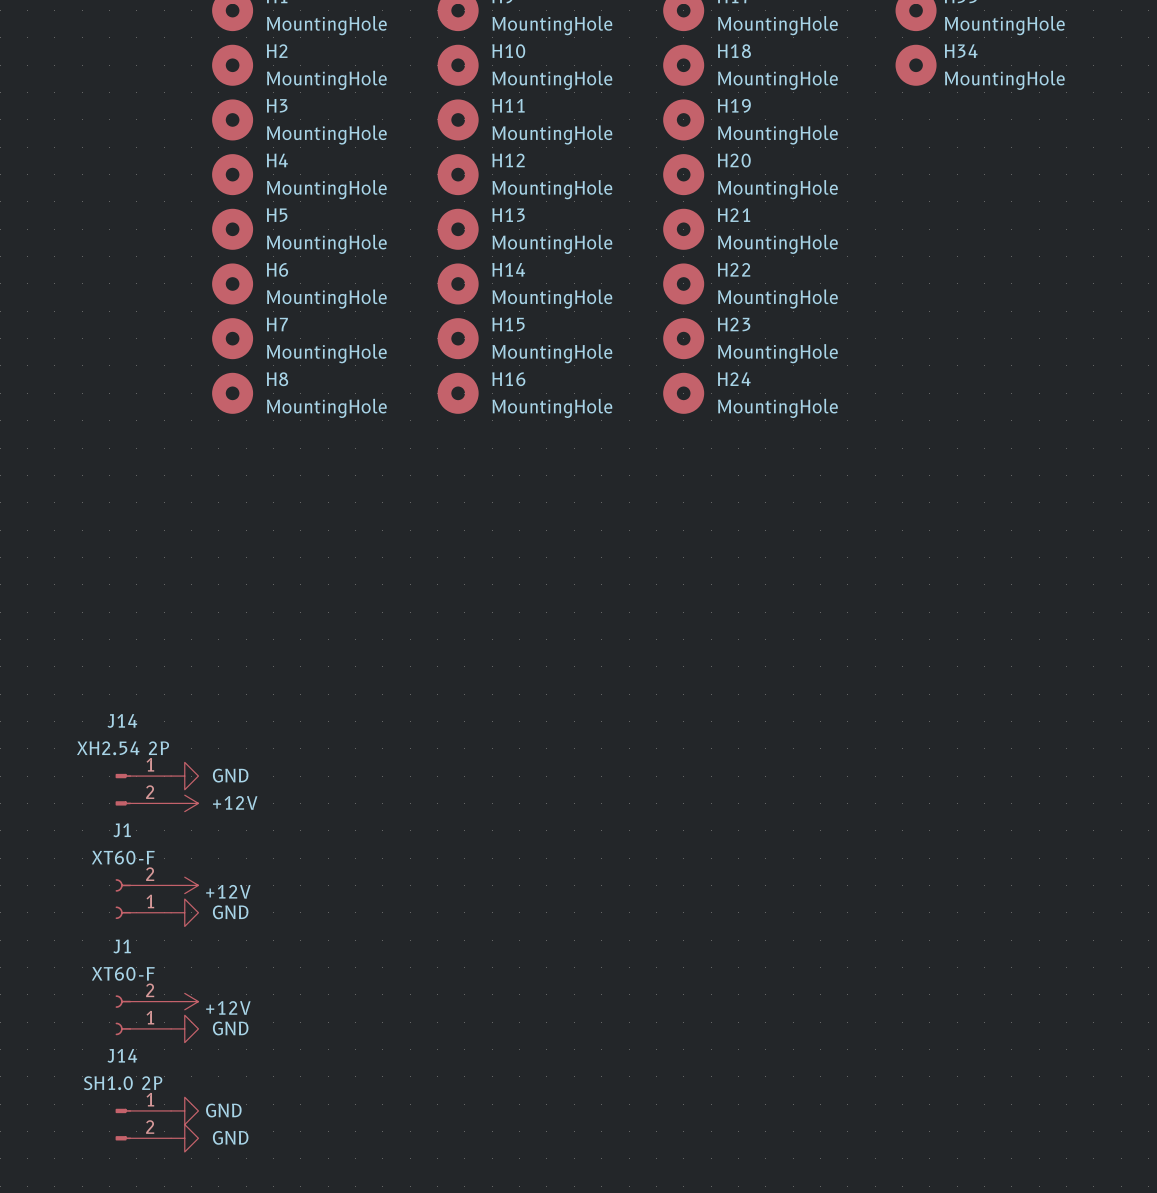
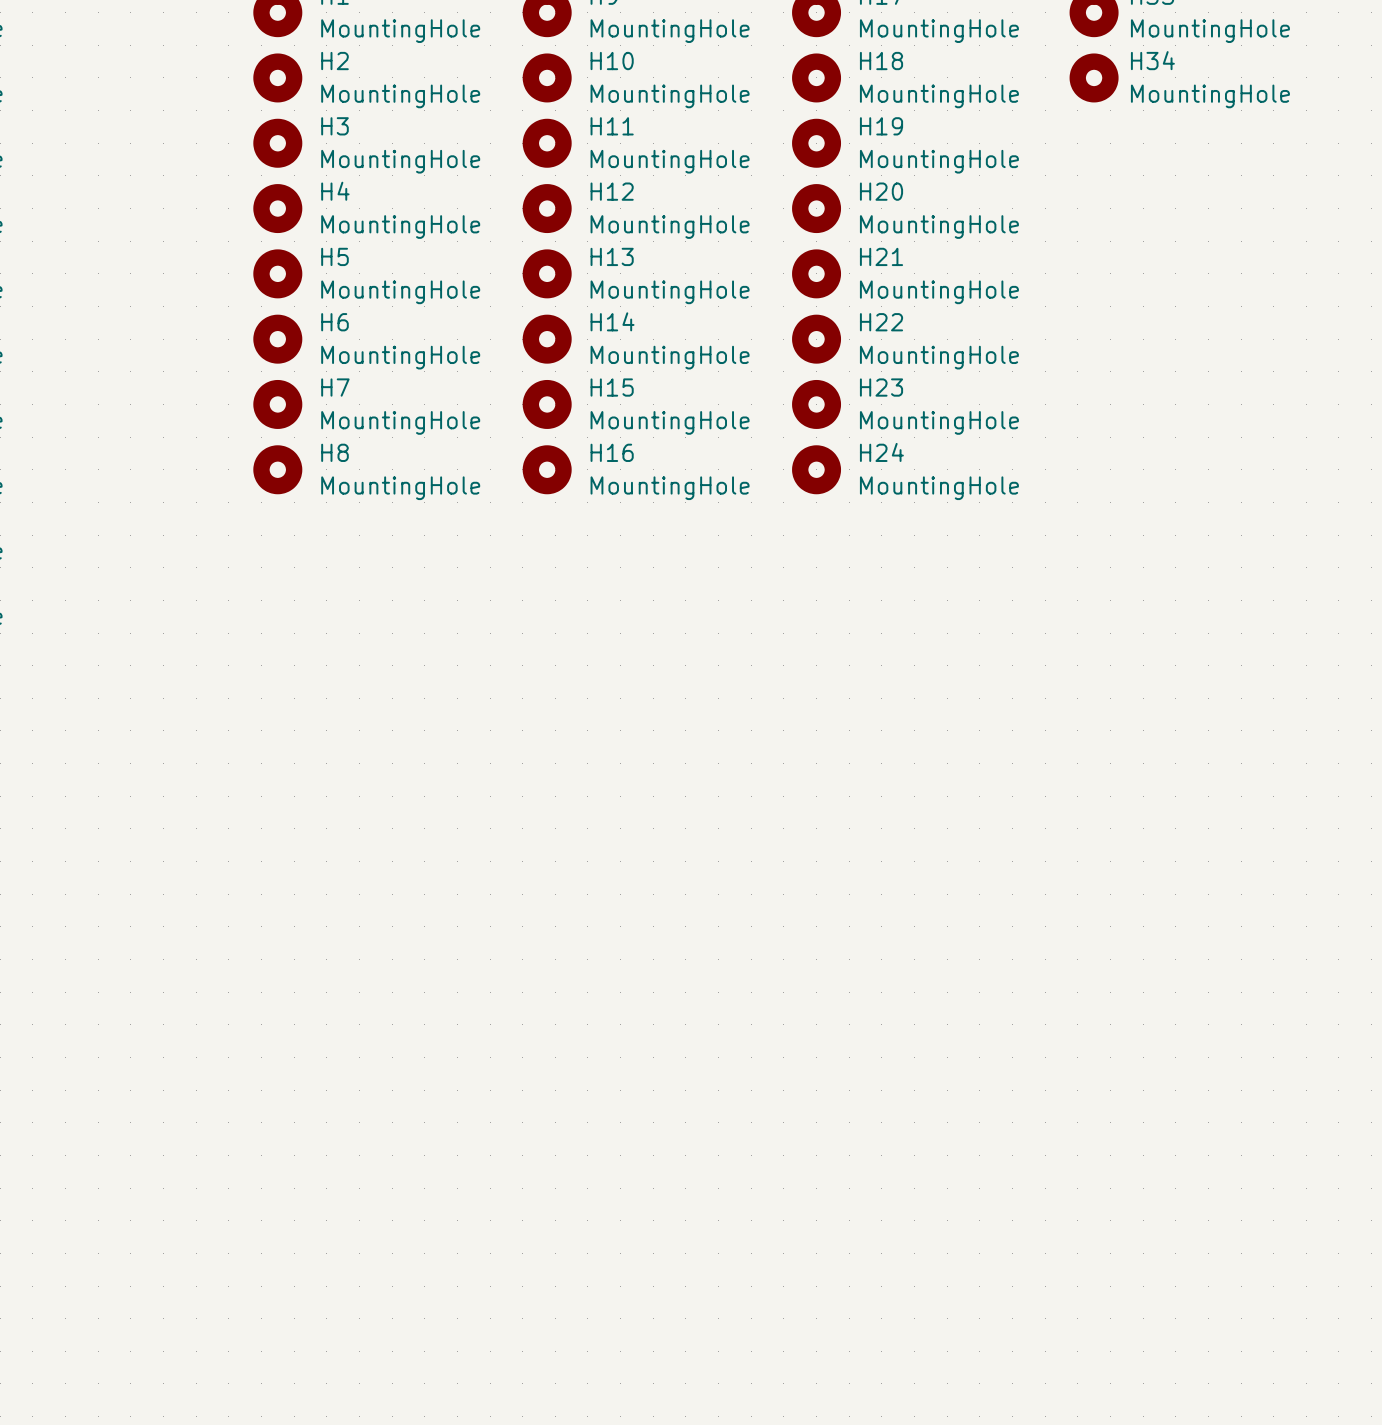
power symbol: GND (184, 776) -> none
J14: XH2.54 2P (143, 789) -> none
power symbol: +12V (184, 803) -> none
power symbol: +12V (184, 885) -> none
J1: XT60-F (143, 899) -> none
power symbol: GND (184, 912) -> none
power symbol: +12V (184, 1001) -> none
J1: XT60-F (143, 1015) -> none
power symbol: GND (184, 1028) -> none
power symbol: GND (184, 1110) -> none
J14: SH1.0 2P (143, 1124) -> none
power symbol: GND (184, 1138) -> none

